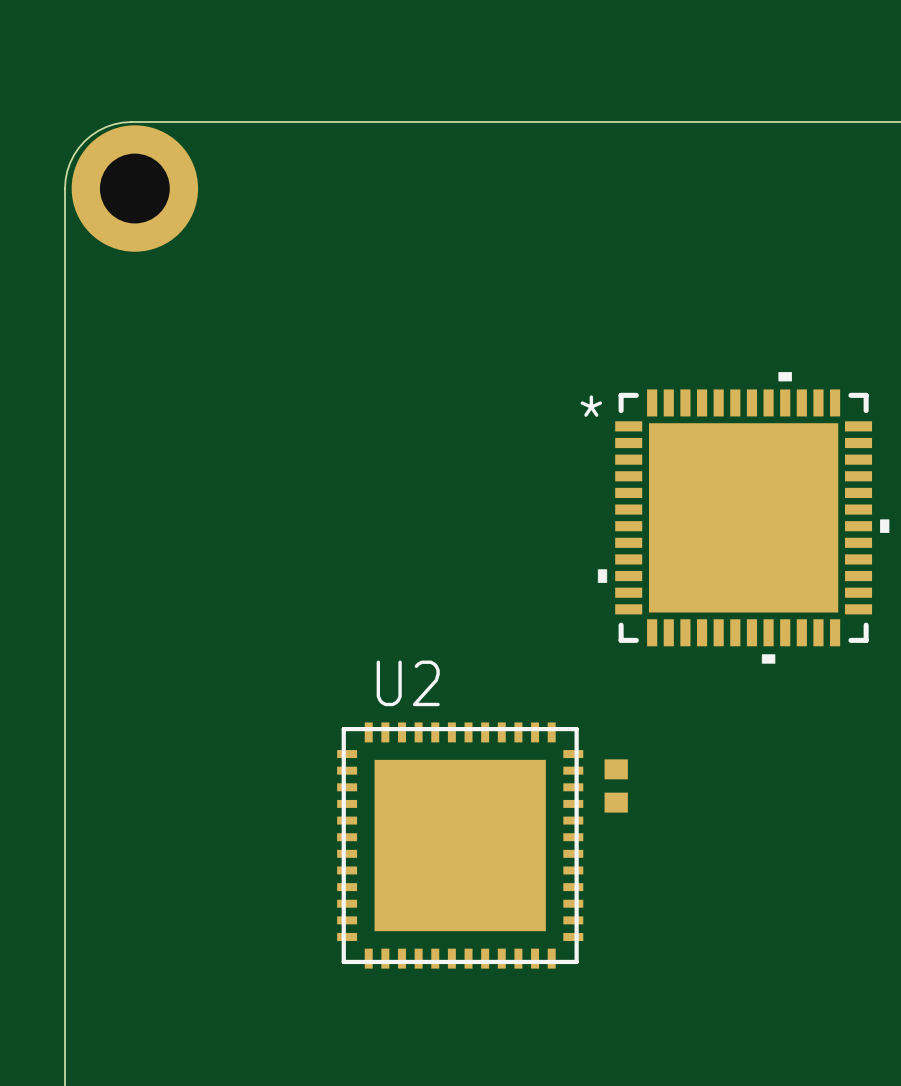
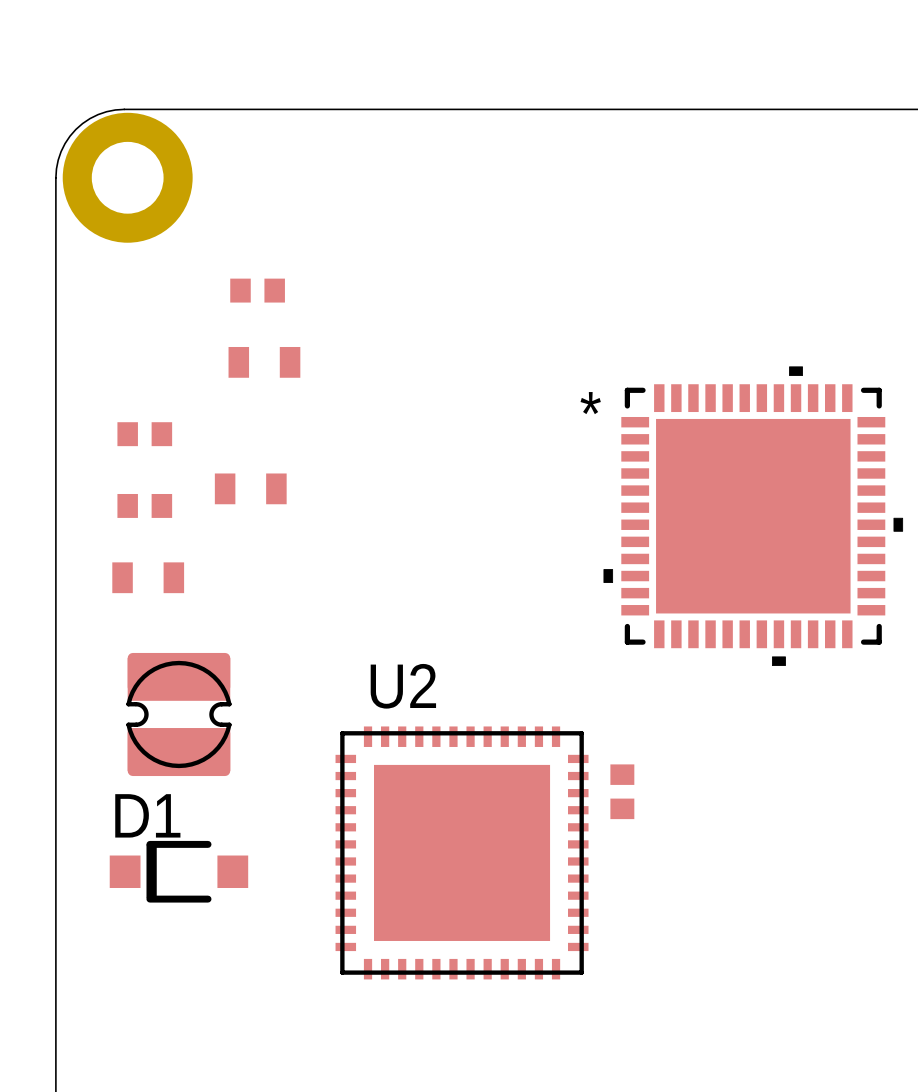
part: none -> (257, 290)
part: none -> (264, 362)
part: none -> (144, 434)
part: none -> (250, 488)
part: none -> (144, 505)
part: none -> (148, 577)
part: none -> (178, 714)
D1: none -> (178, 871)

